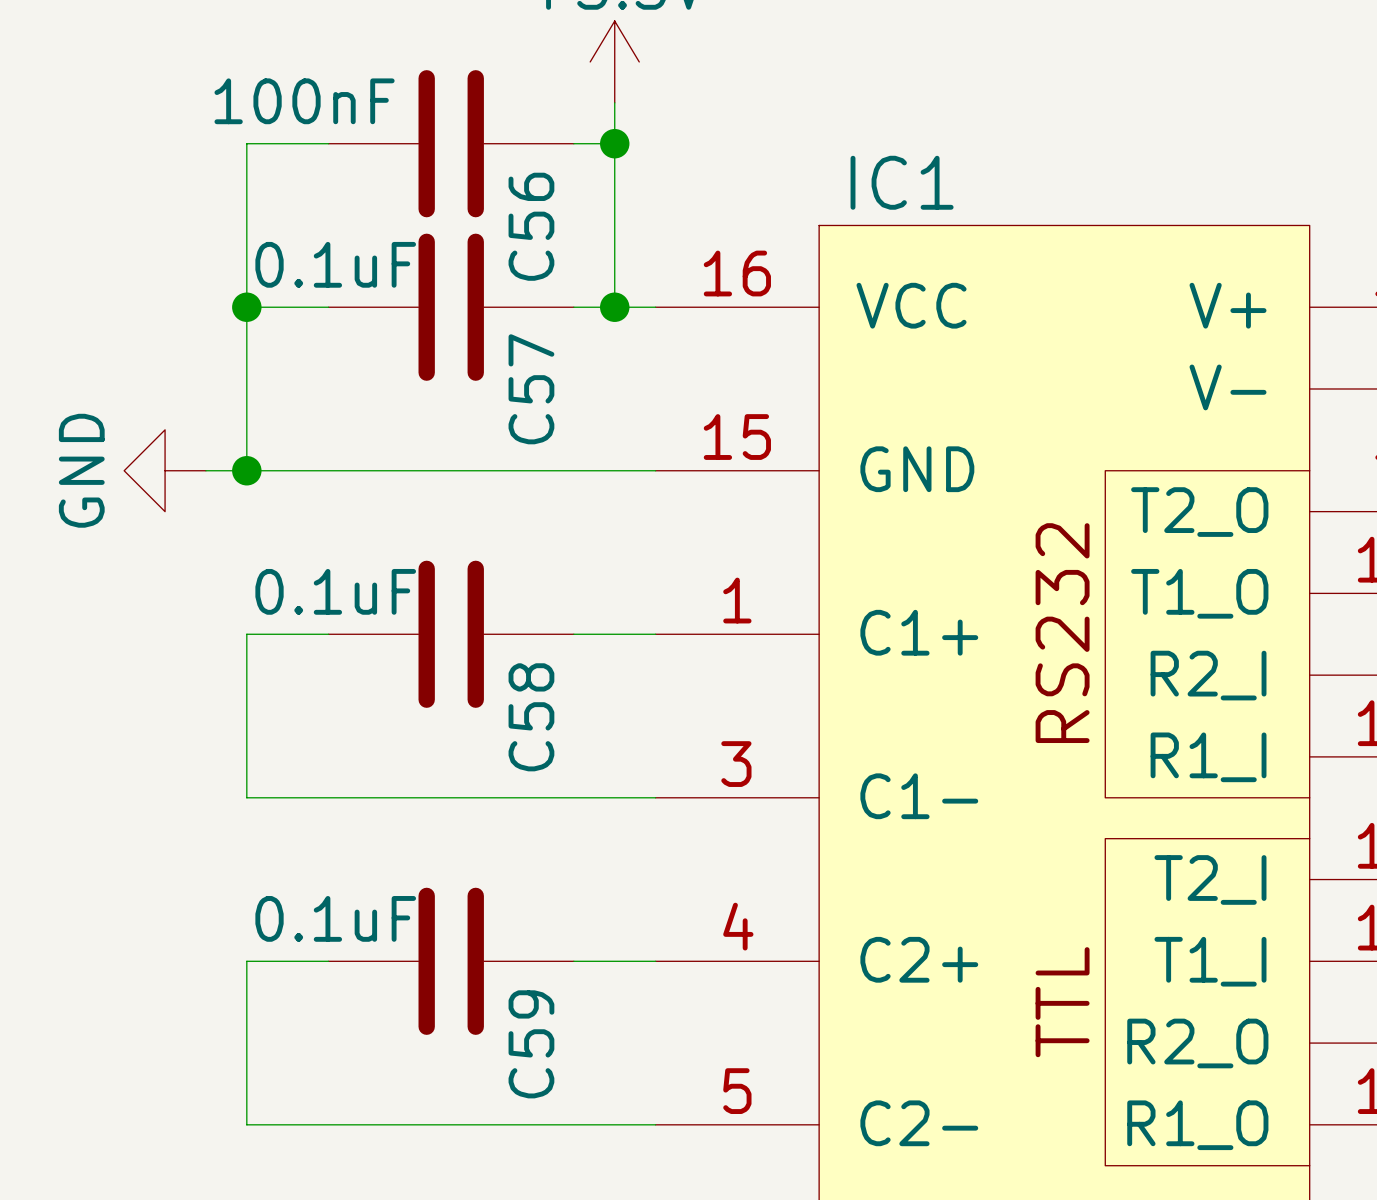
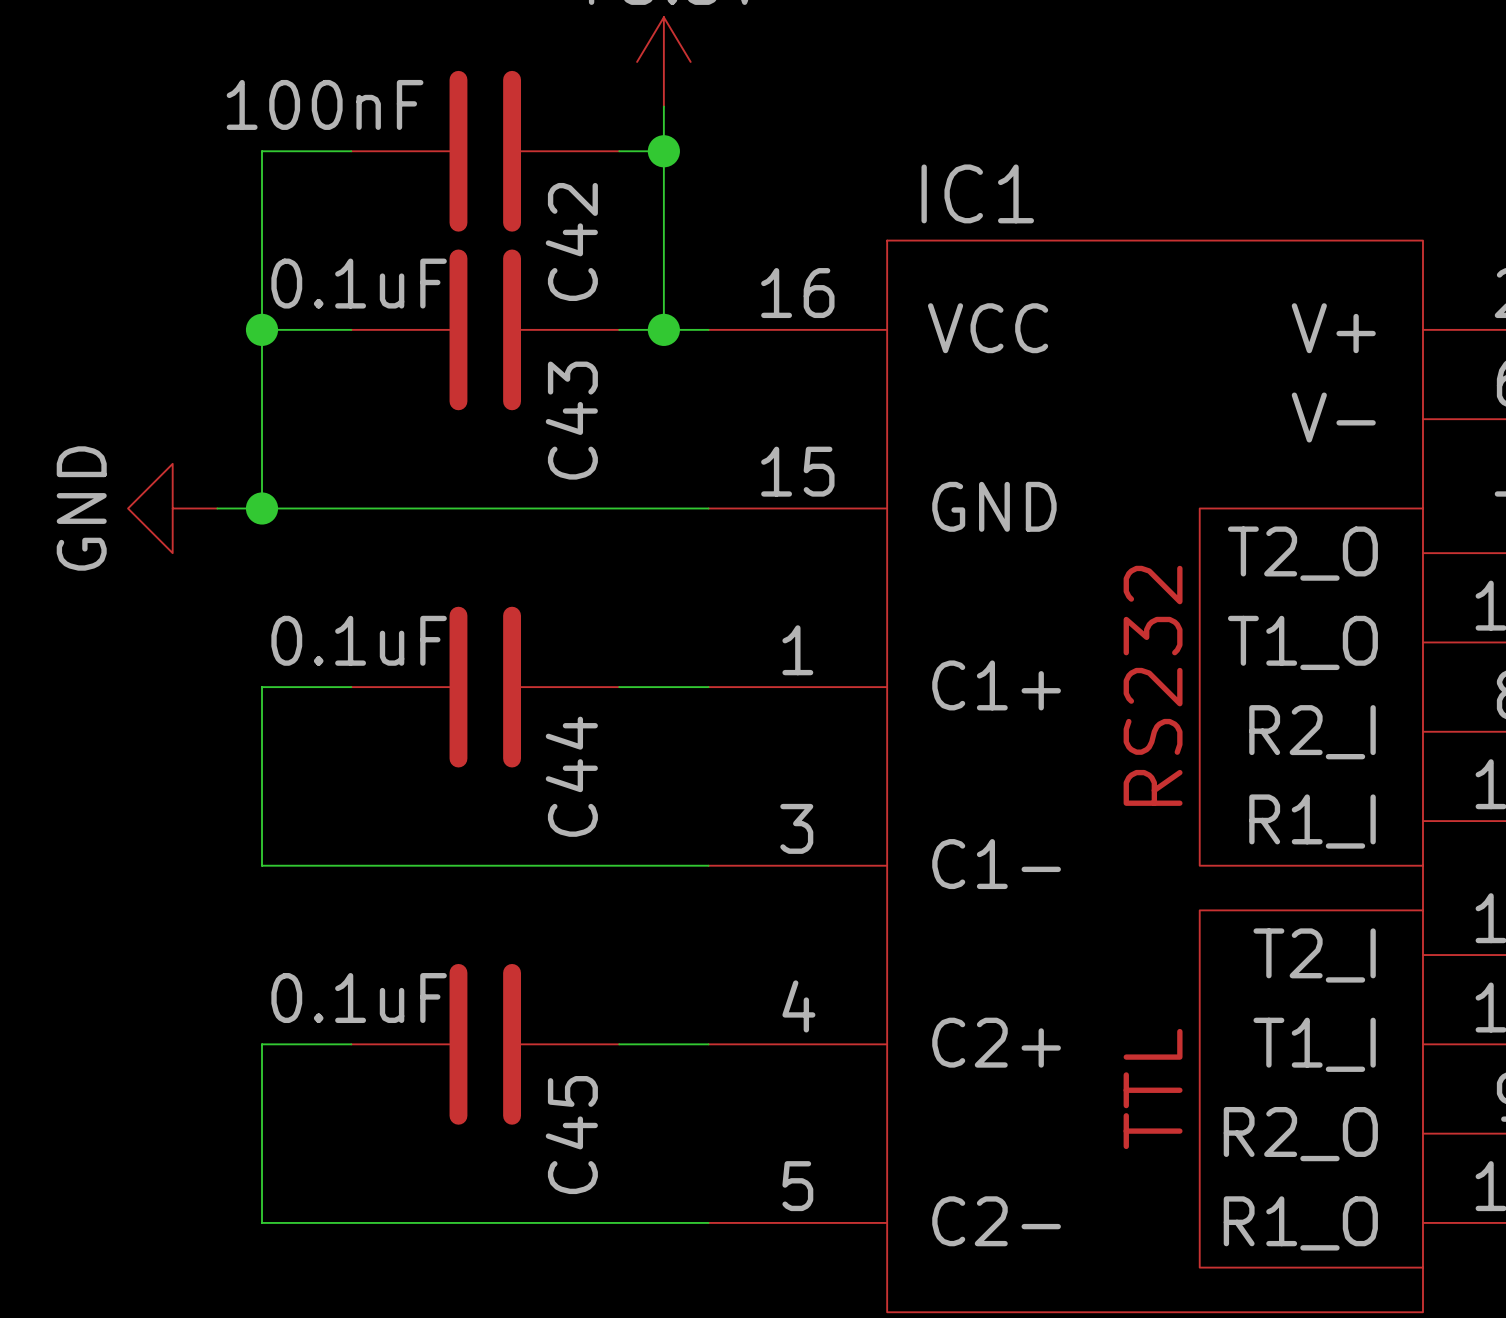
C56 name: C56 (531, 226) -> C42 (571, 241)
C57 name: C57 (531, 389) -> C43 (571, 420)
C58 name: C58 (531, 717) -> C44 (571, 776)
C59 name: C59 (531, 1044) -> C45 (571, 1135)

